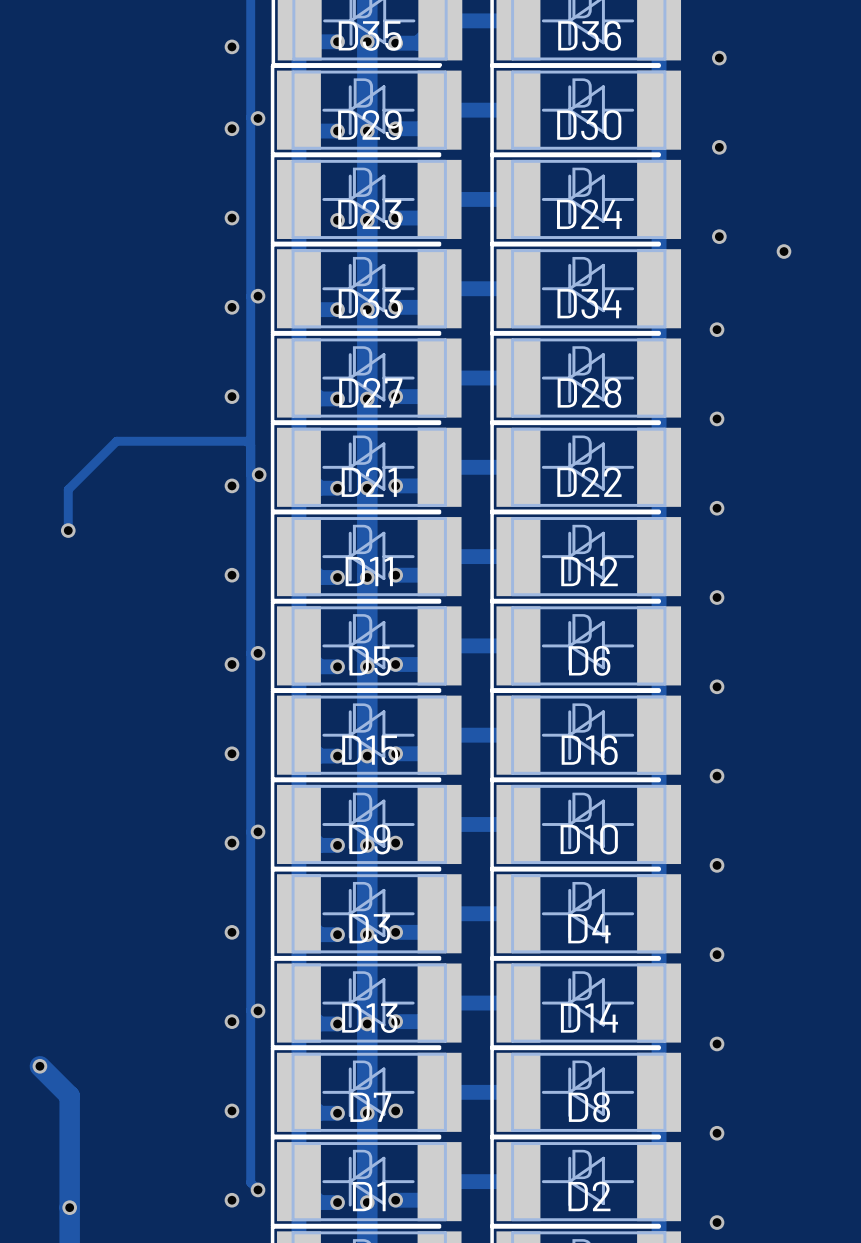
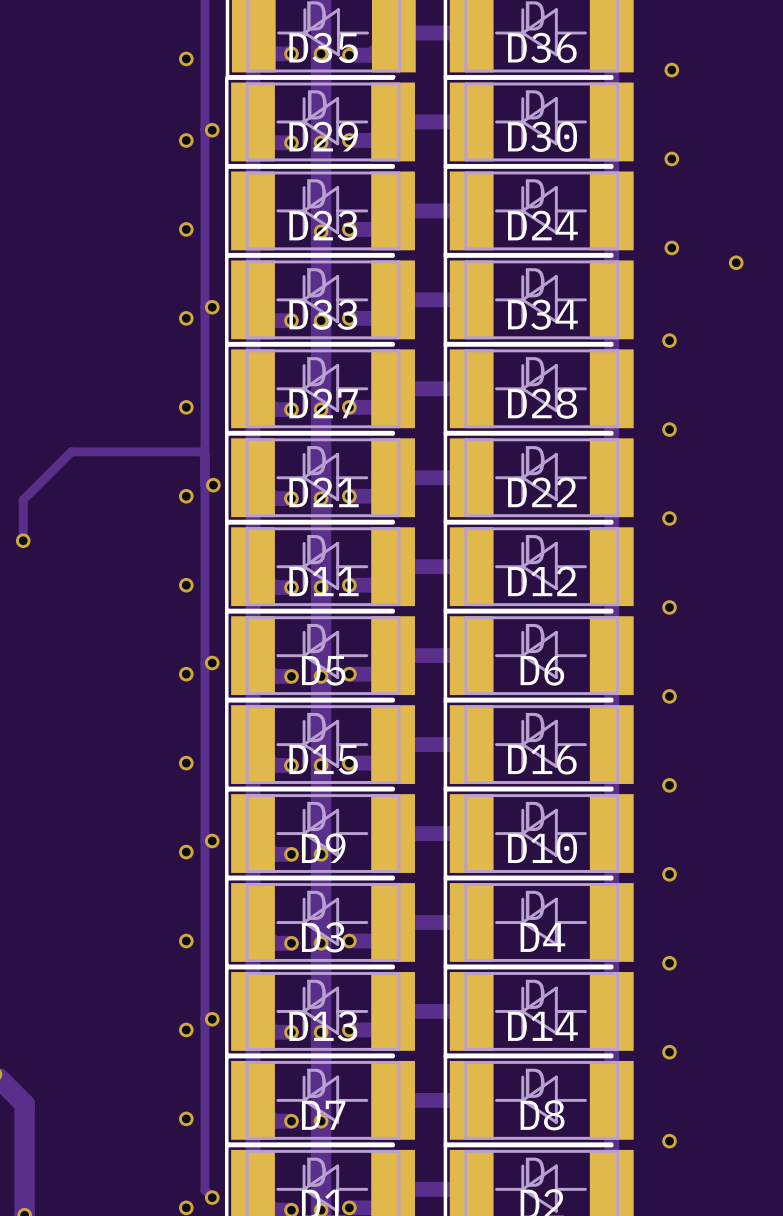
via: (337, 220) -> none
via: (395, 843) -> none
via: (395, 1110) -> none

